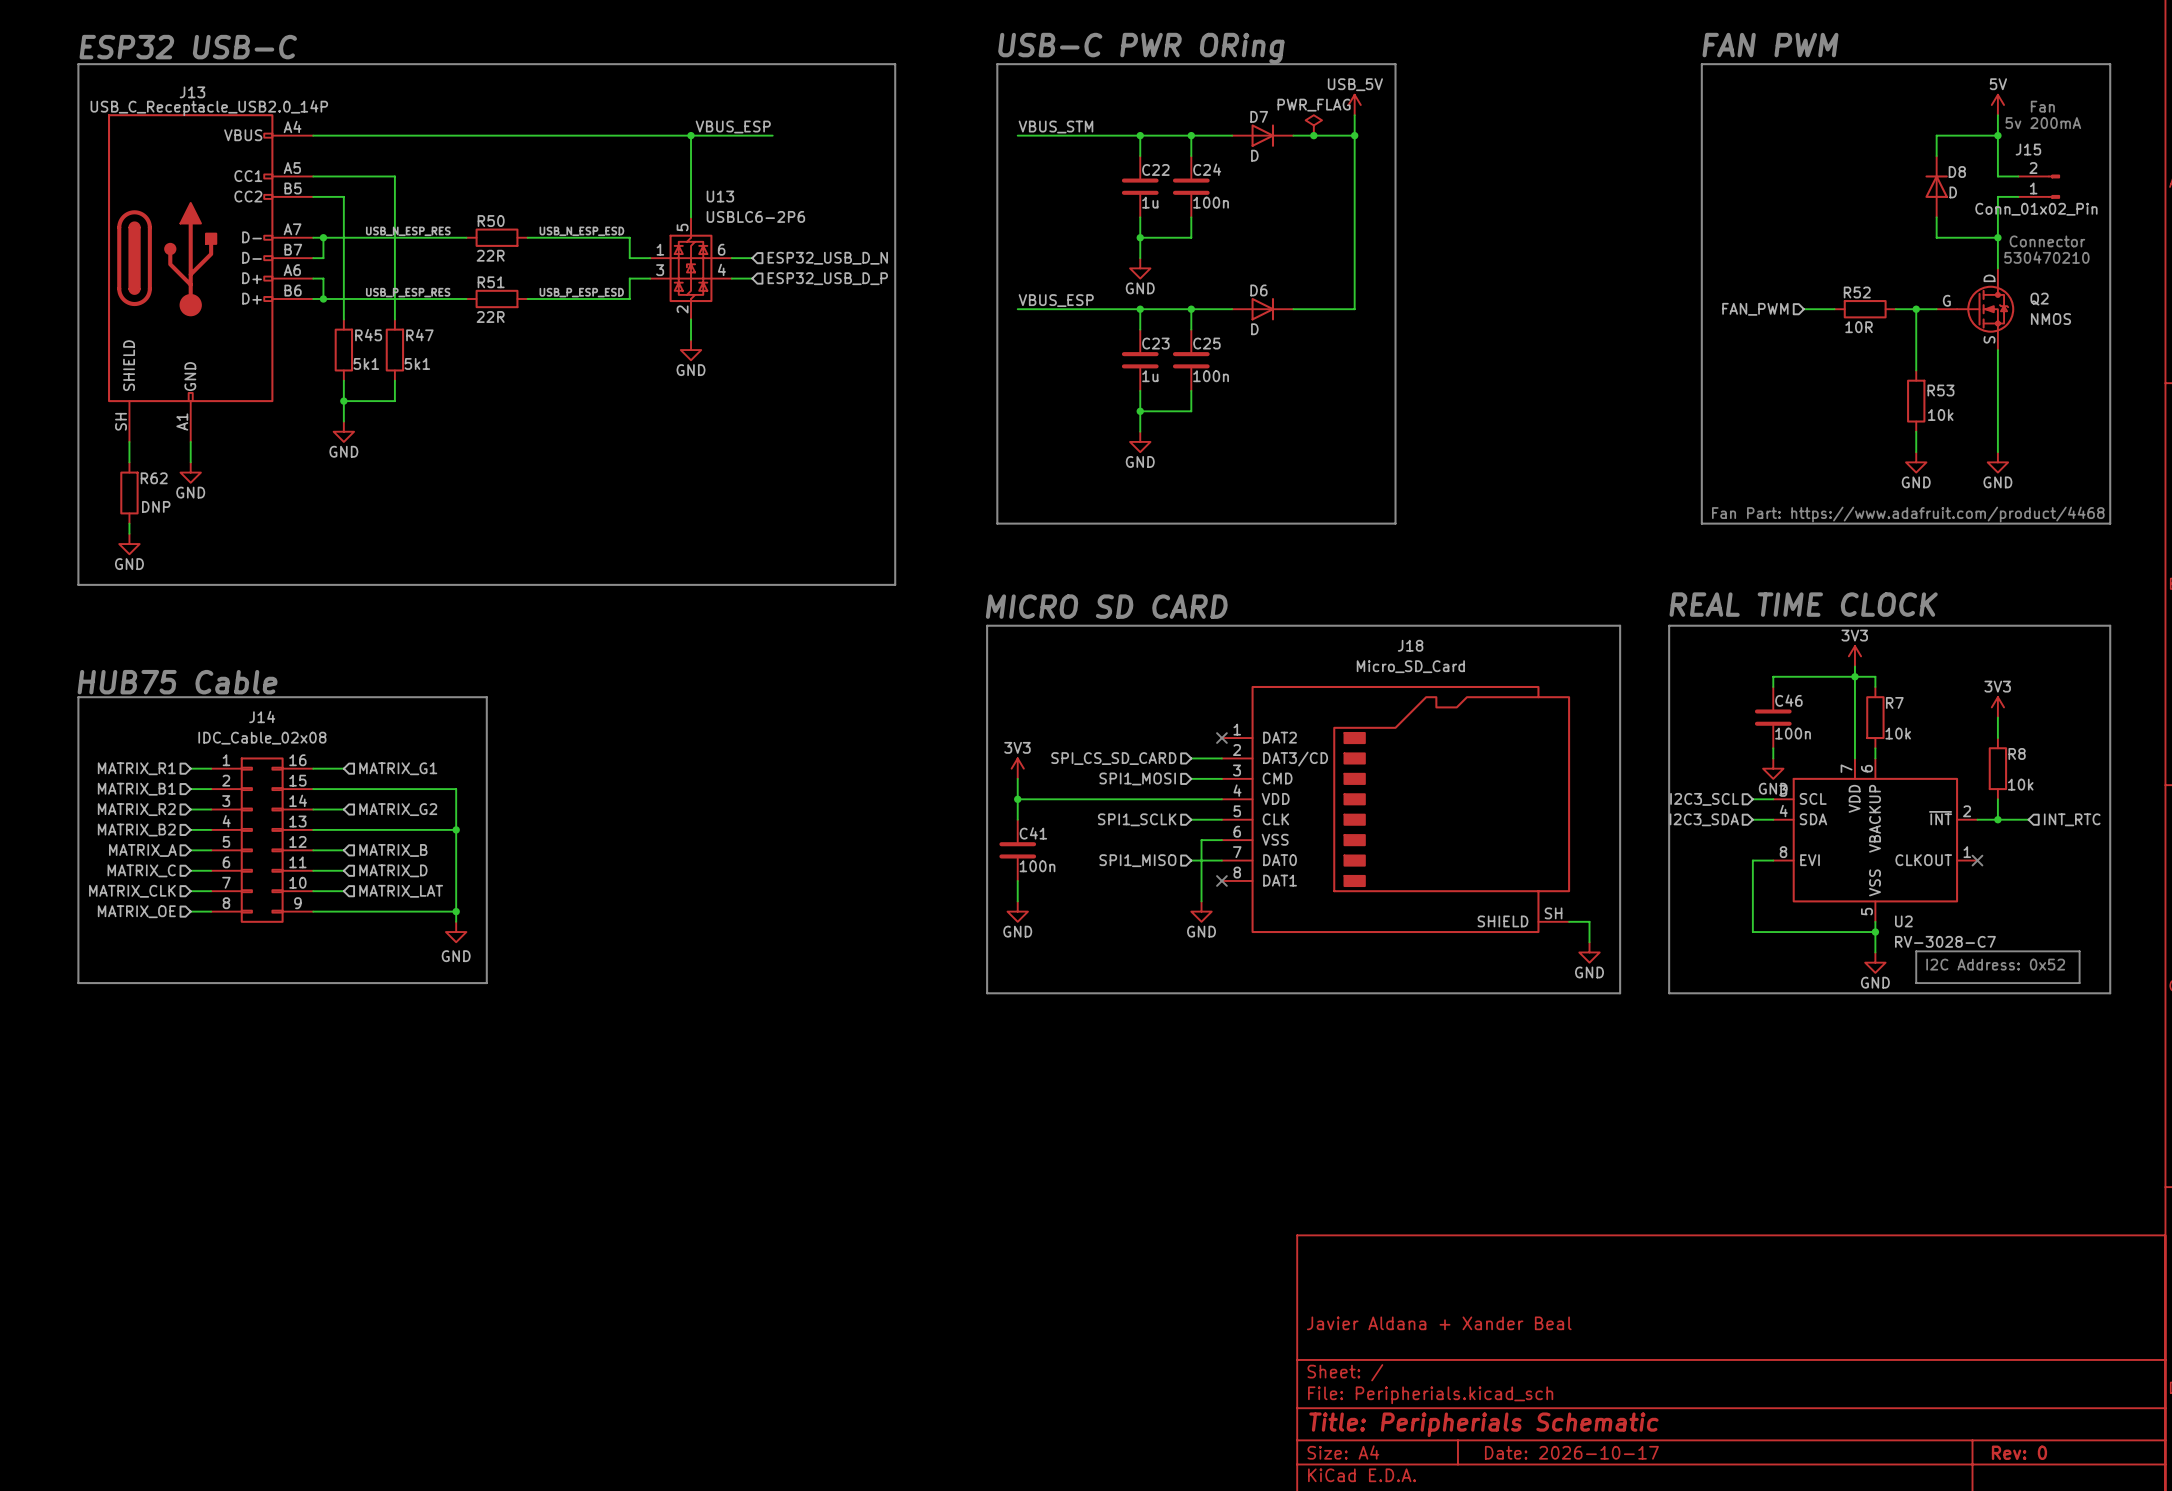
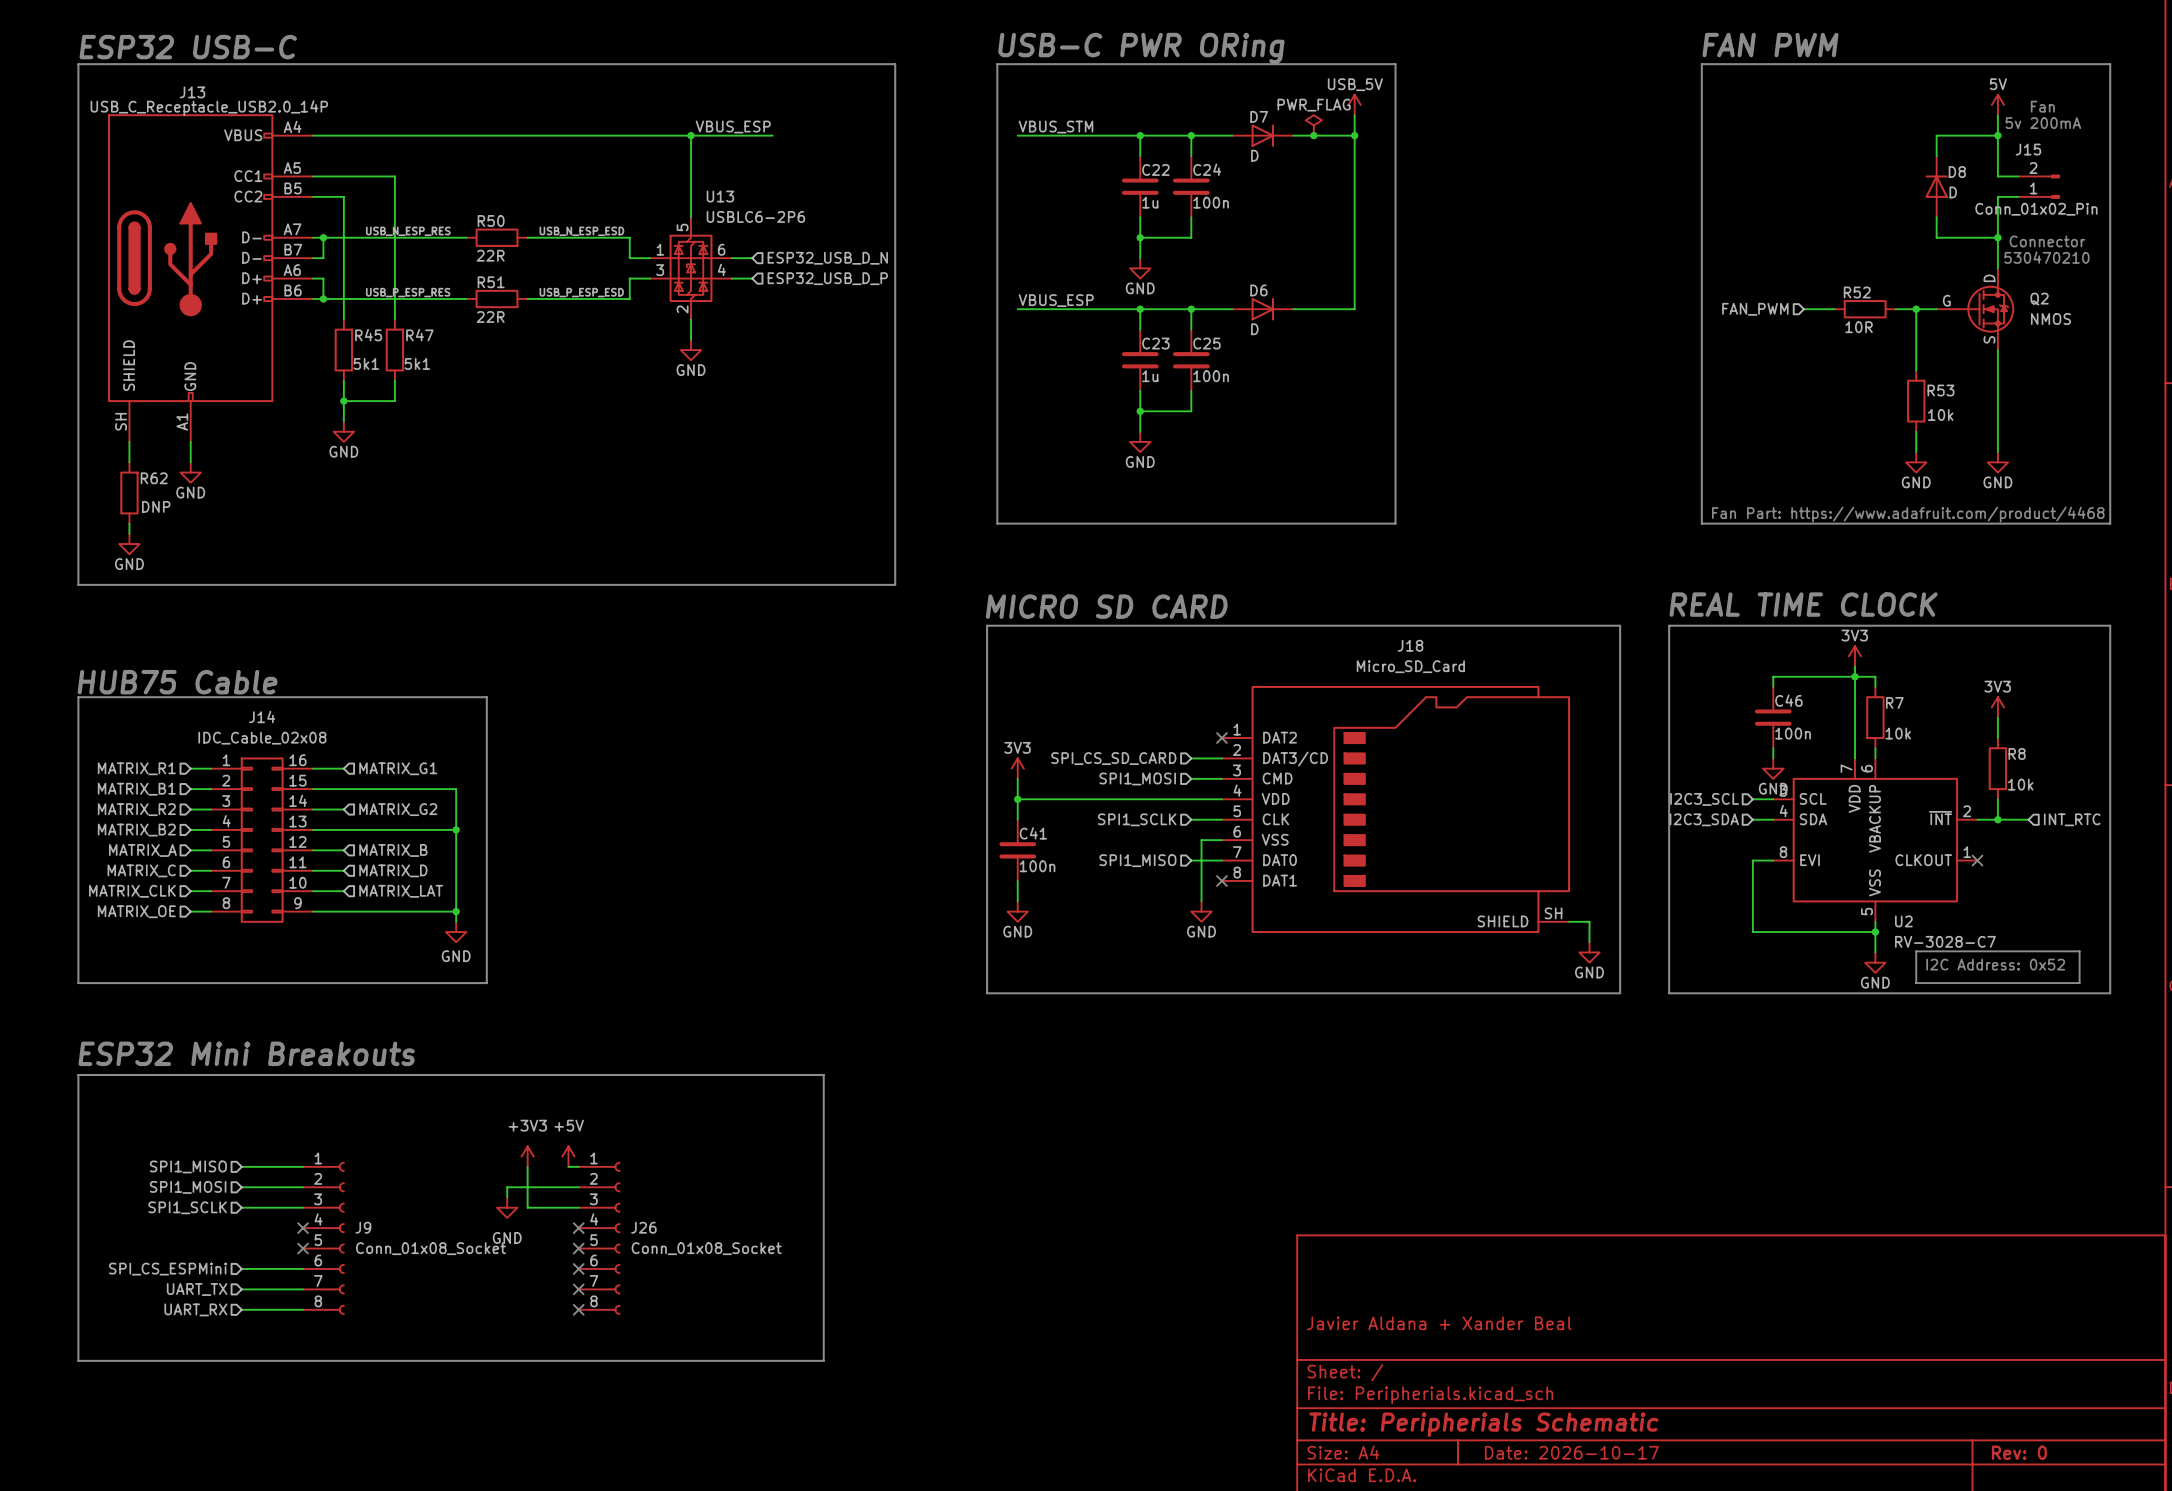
text: none -> ESP32 Mini Breakouts (246, 1053)
line: none -> (78, 1074) (823, 1074) (823, 1360) (78, 1360) (78, 1074)
power symbol: none -> +3V3 (527, 1156)
power symbol: none -> +5V (568, 1156)
hierarchical label: none -> SPI1_MISO (188, 1166)
wire: none -> (241, 1166) (303, 1166)
wire: none -> (527, 1166) (527, 1207) (578, 1207)
wire: none -> (568, 1166) (578, 1166)
hierarchical label: none -> SPI1_MOSI (188, 1187)
wire: none -> (241, 1187) (303, 1187)
wire: none -> (578, 1187) (507, 1187) (507, 1197)
hierarchical label: none -> SPI1_SCLK (187, 1207)
wire: none -> (241, 1207) (303, 1207)
power symbol: none -> GND (507, 1207)
no-connect mark: none -> (303, 1228)
no-connect mark: none -> (578, 1228)
J9: none -> Conn_01x08_Socket (323, 1238)
J26: none -> Conn_01x08_Socket (599, 1238)
no-connect mark: none -> (303, 1248)
no-connect mark: none -> (578, 1248)
wire: none -> (241, 1268) (303, 1268)
no-connect mark: none -> (578, 1268)
hierarchical label: none -> SPI_CS_ESPMini (167, 1269)
hierarchical label: none -> UART_TX (197, 1289)
wire: none -> (241, 1289) (303, 1289)
no-connect mark: none -> (578, 1289)
hierarchical label: none -> UART_RX (195, 1309)
wire: none -> (241, 1309) (303, 1309)
no-connect mark: none -> (578, 1309)

